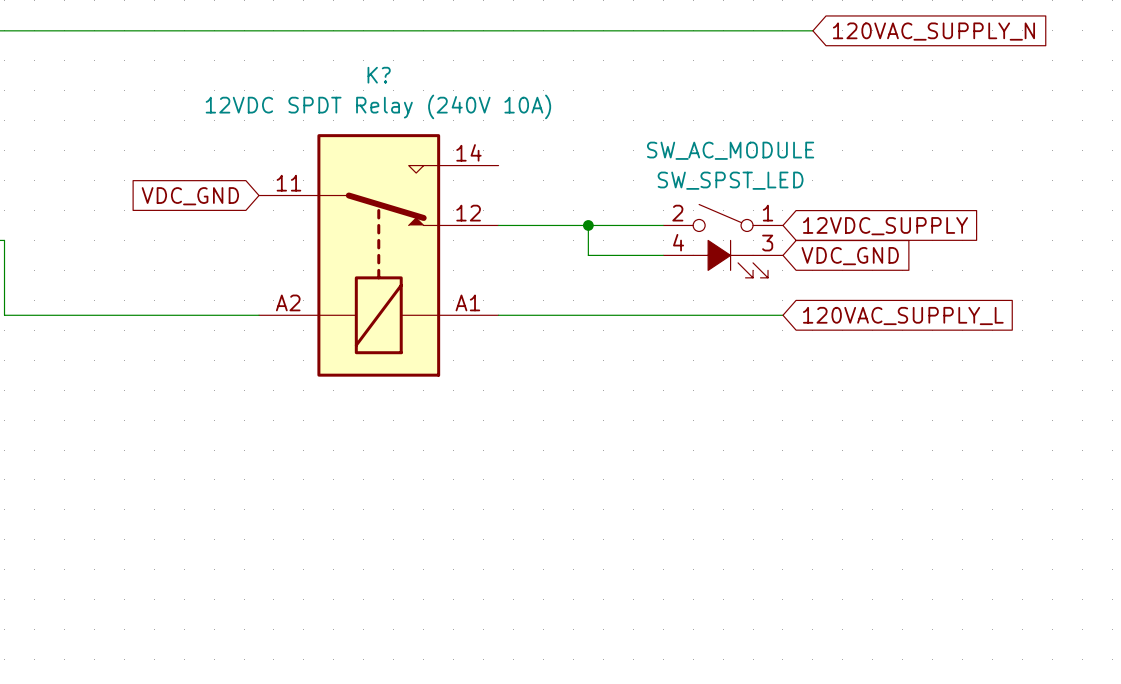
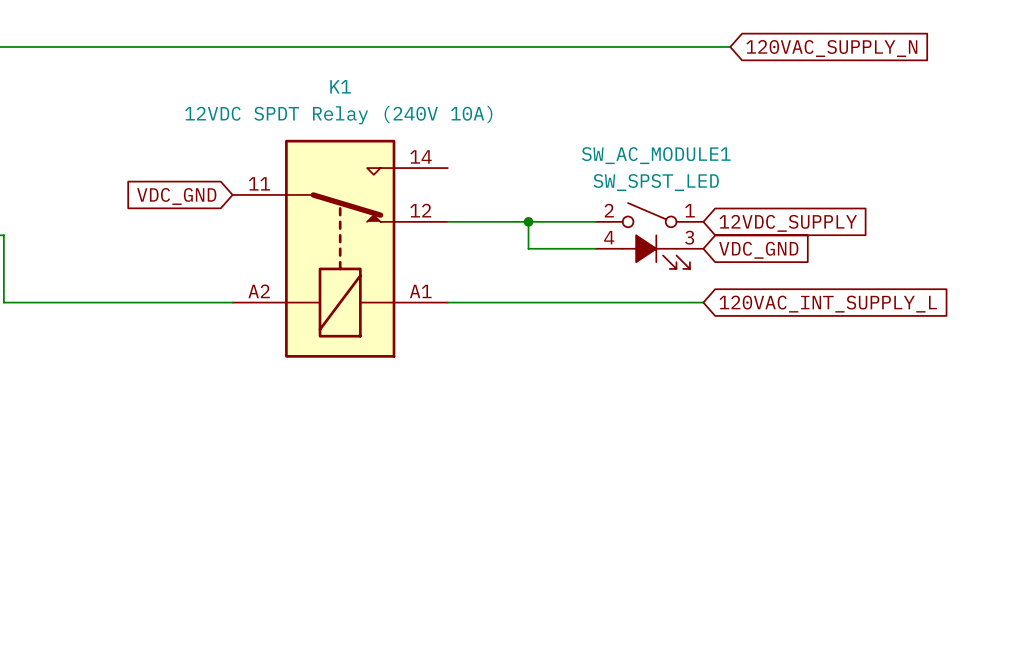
K? name: K? (379, 75) -> K1 (340, 86)
SW_AC_MODULE name: SW_AC_MODULE (730, 150) -> SW_AC_MODULE1 (656, 155)
global label: 120VAC_SUPPLY_L (903, 316) -> 120VAC_INT_SUPPLY_L (828, 304)

